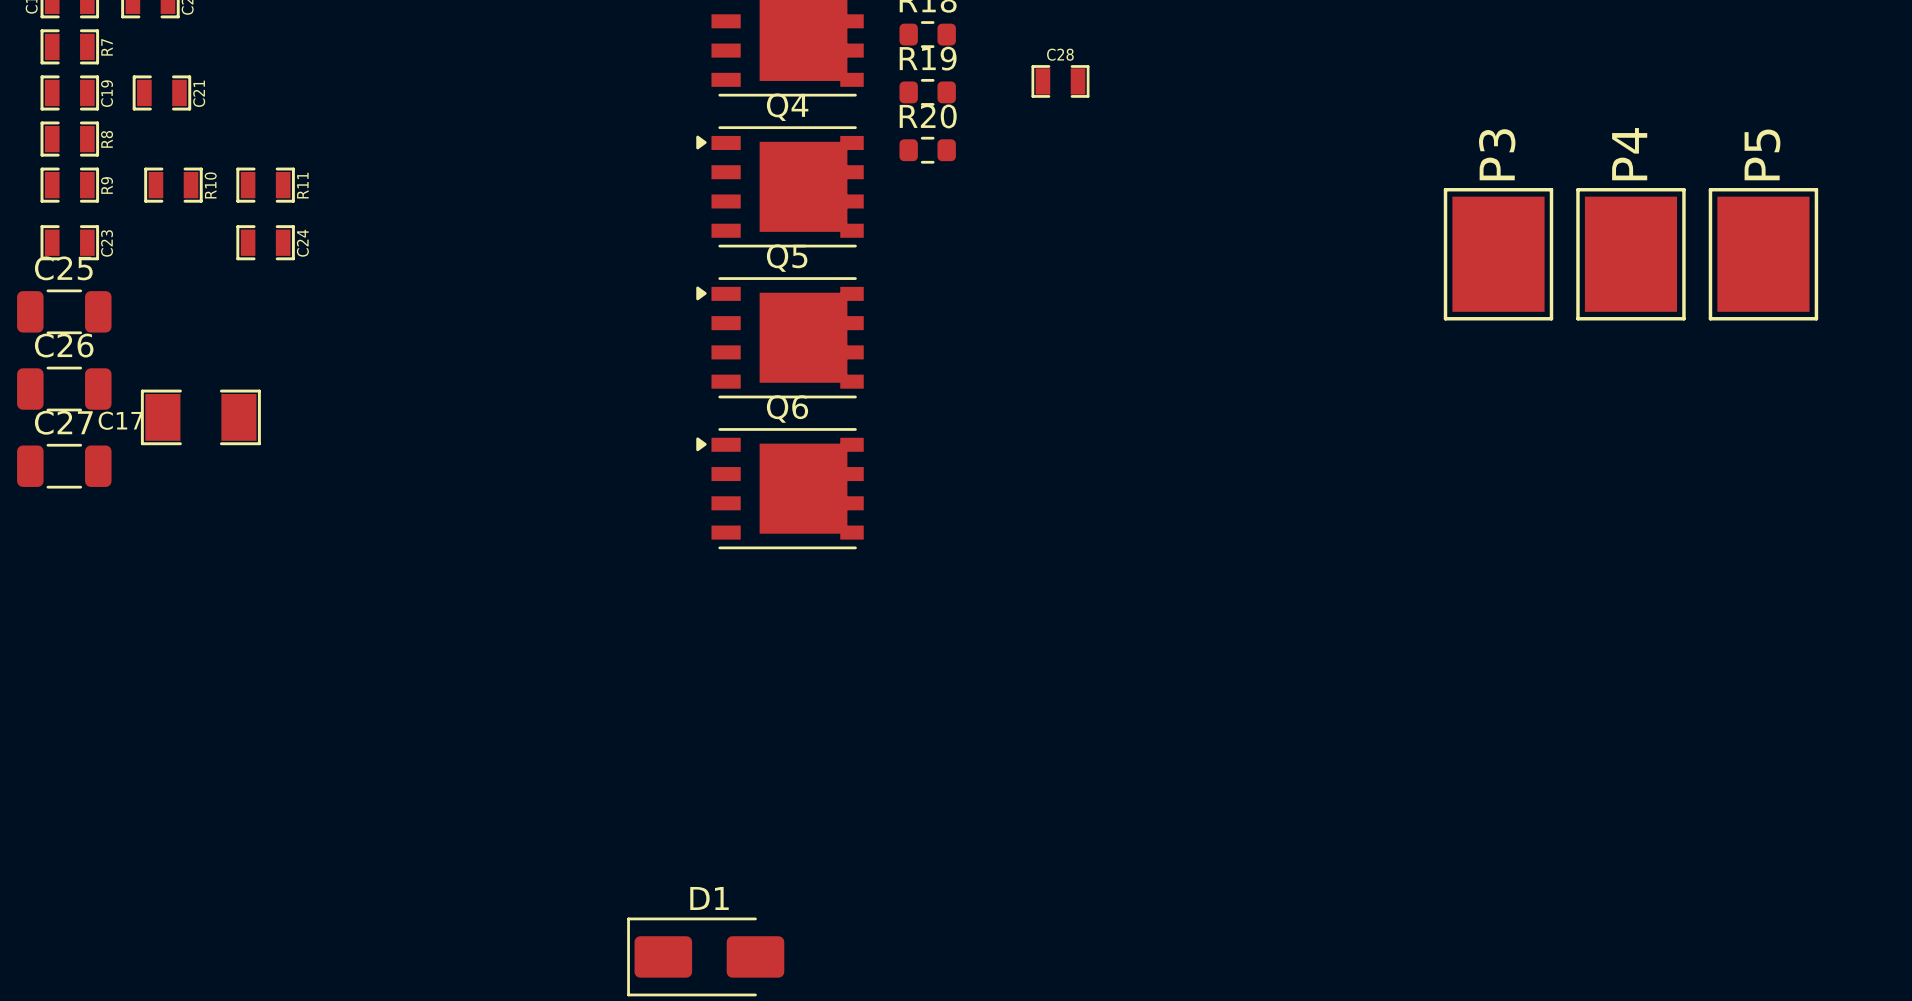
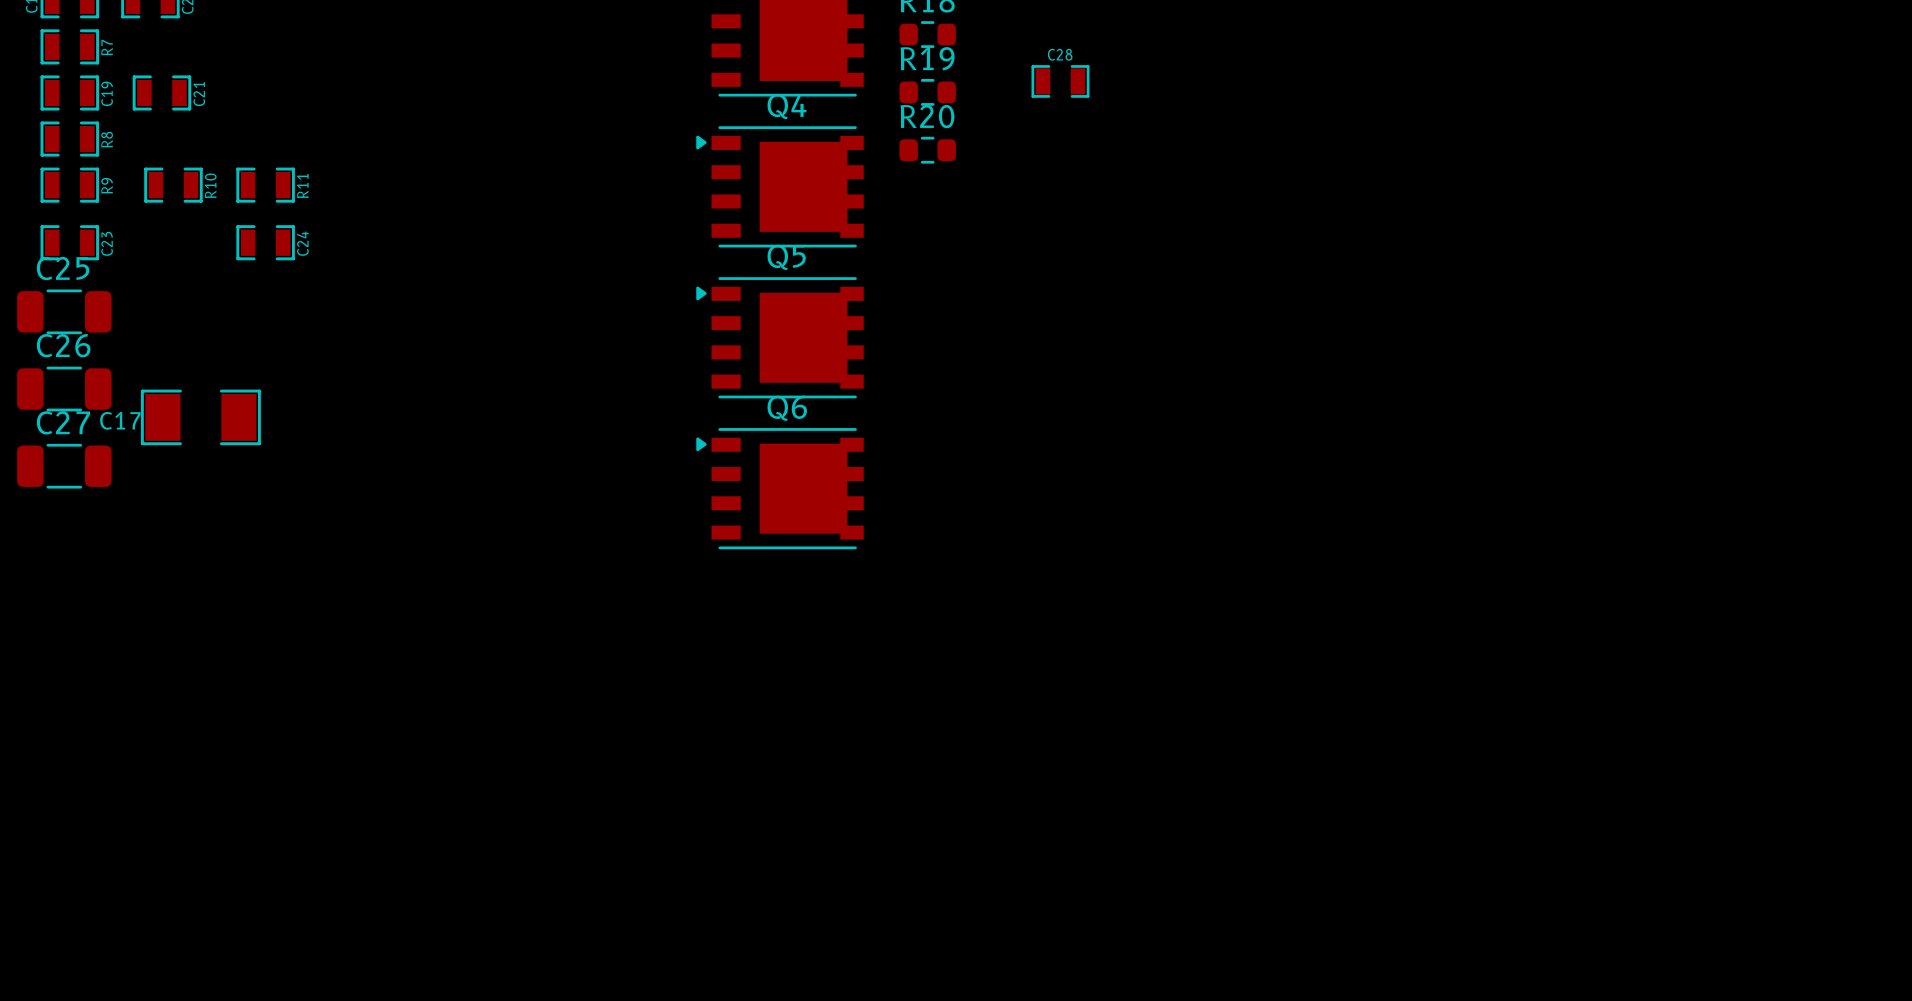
P3: (1498, 254) -> none
P4: (1630, 254) -> none
P5: (1763, 254) -> none
D1: (705, 956) -> none

